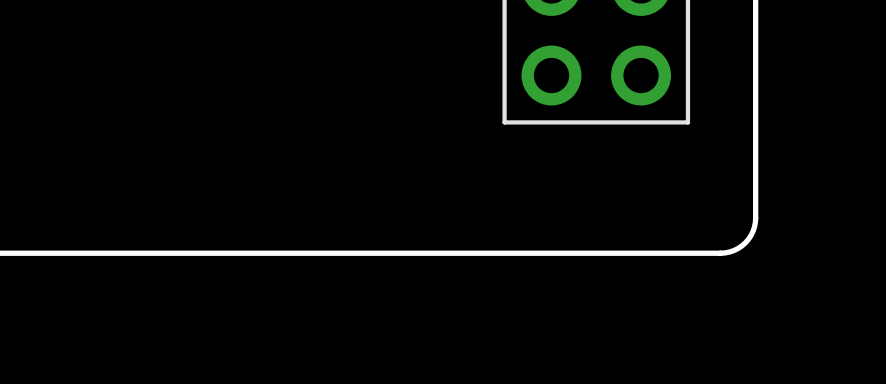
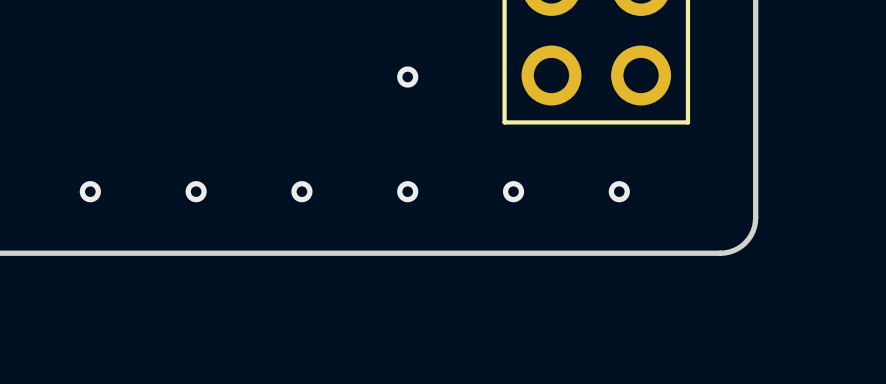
via: none -> (407, 77)
via: none -> (90, 191)
via: none -> (196, 191)
via: none -> (301, 191)
via: none -> (407, 191)
via: none -> (513, 191)
via: none -> (619, 191)

